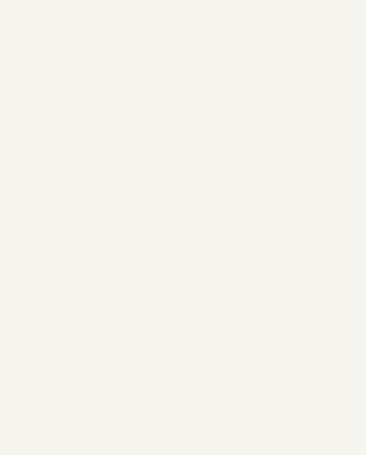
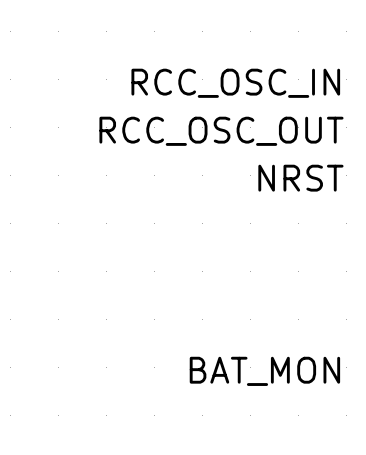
label: none -> RCC_OSC_IN (235, 83)
label: none -> RCC_OSC_OUT (221, 131)
label: none -> NRST (300, 178)
label: none -> BAT_MON (264, 371)

